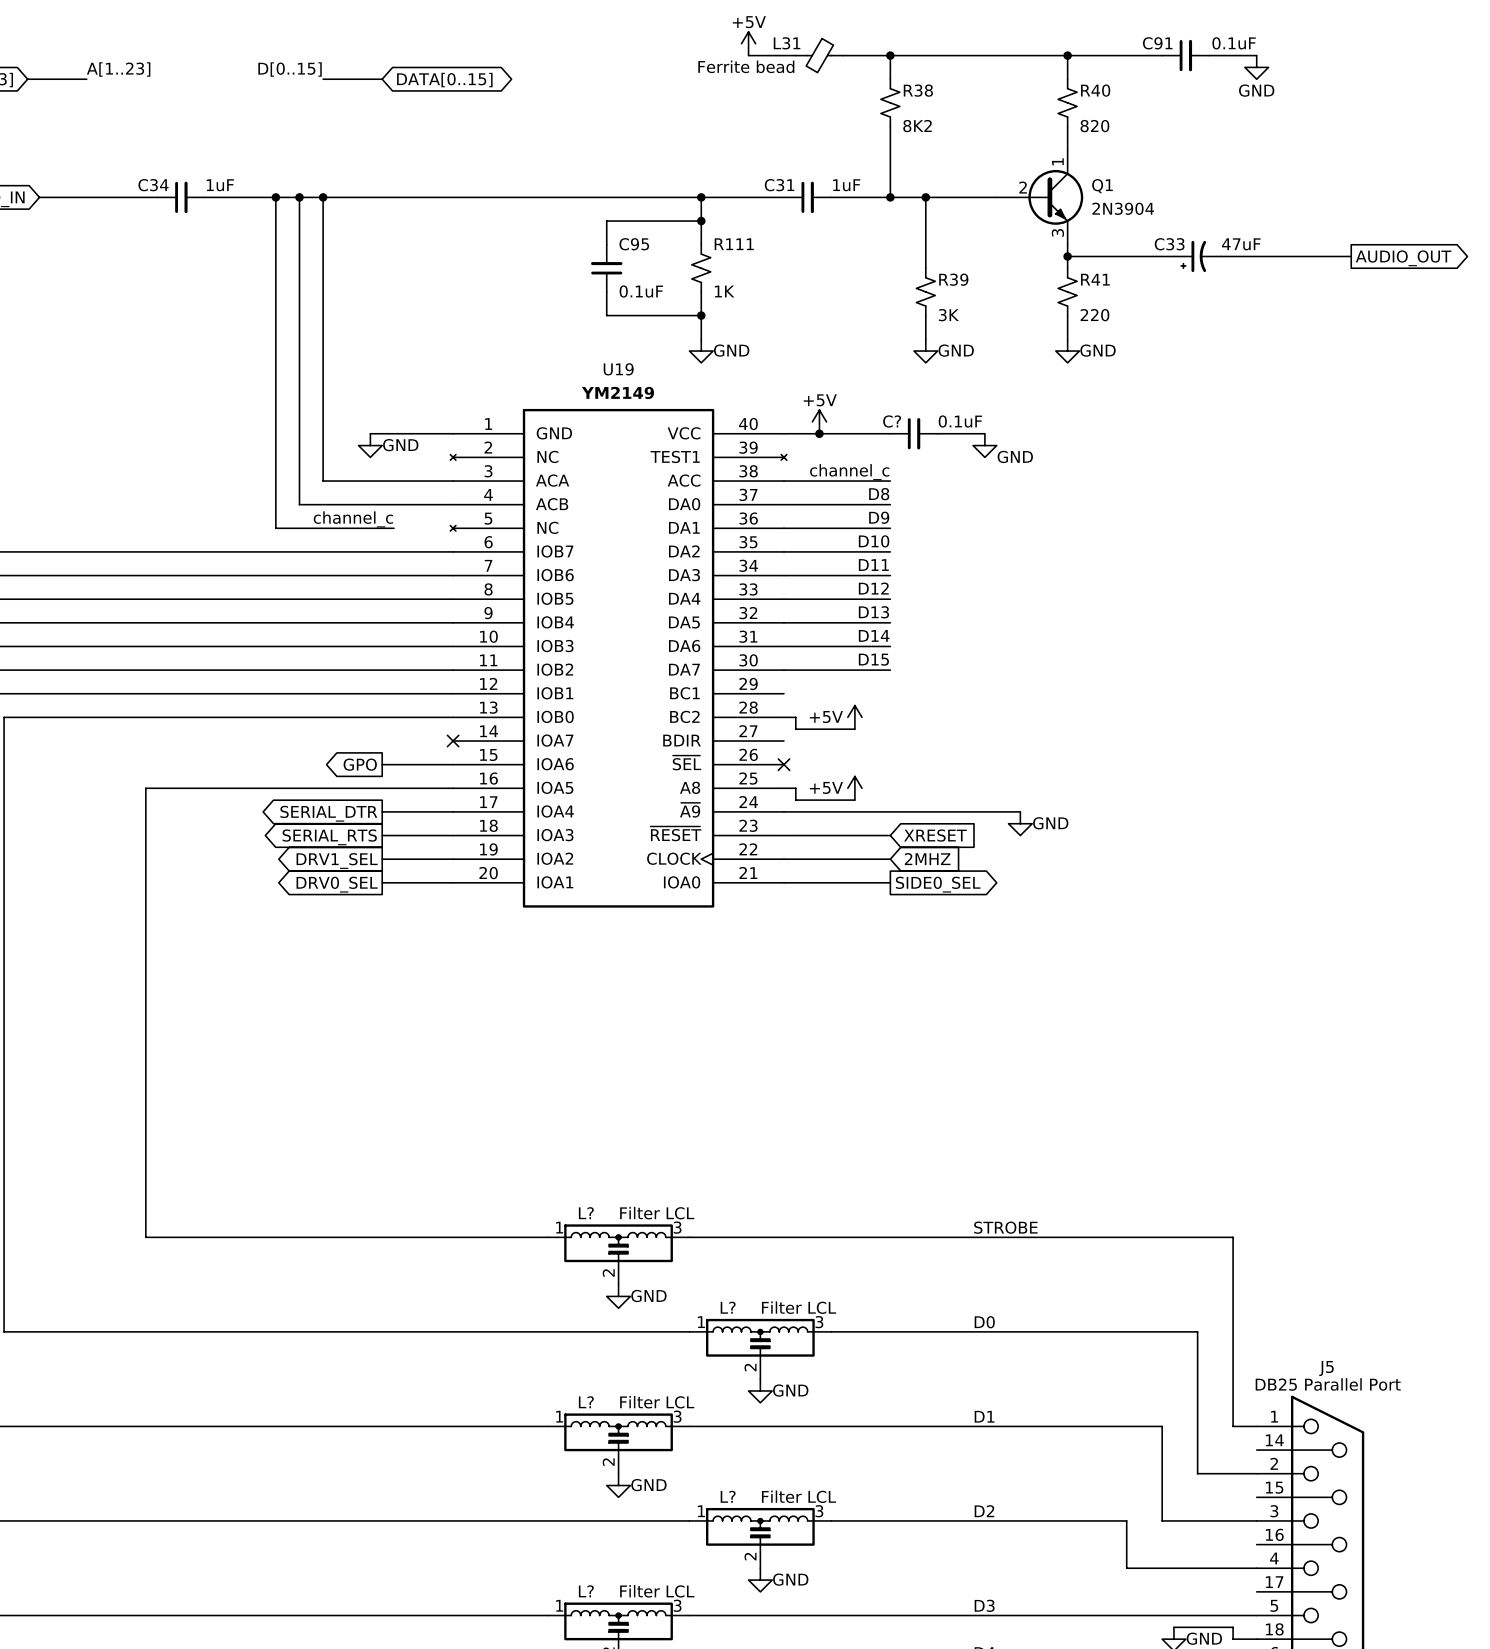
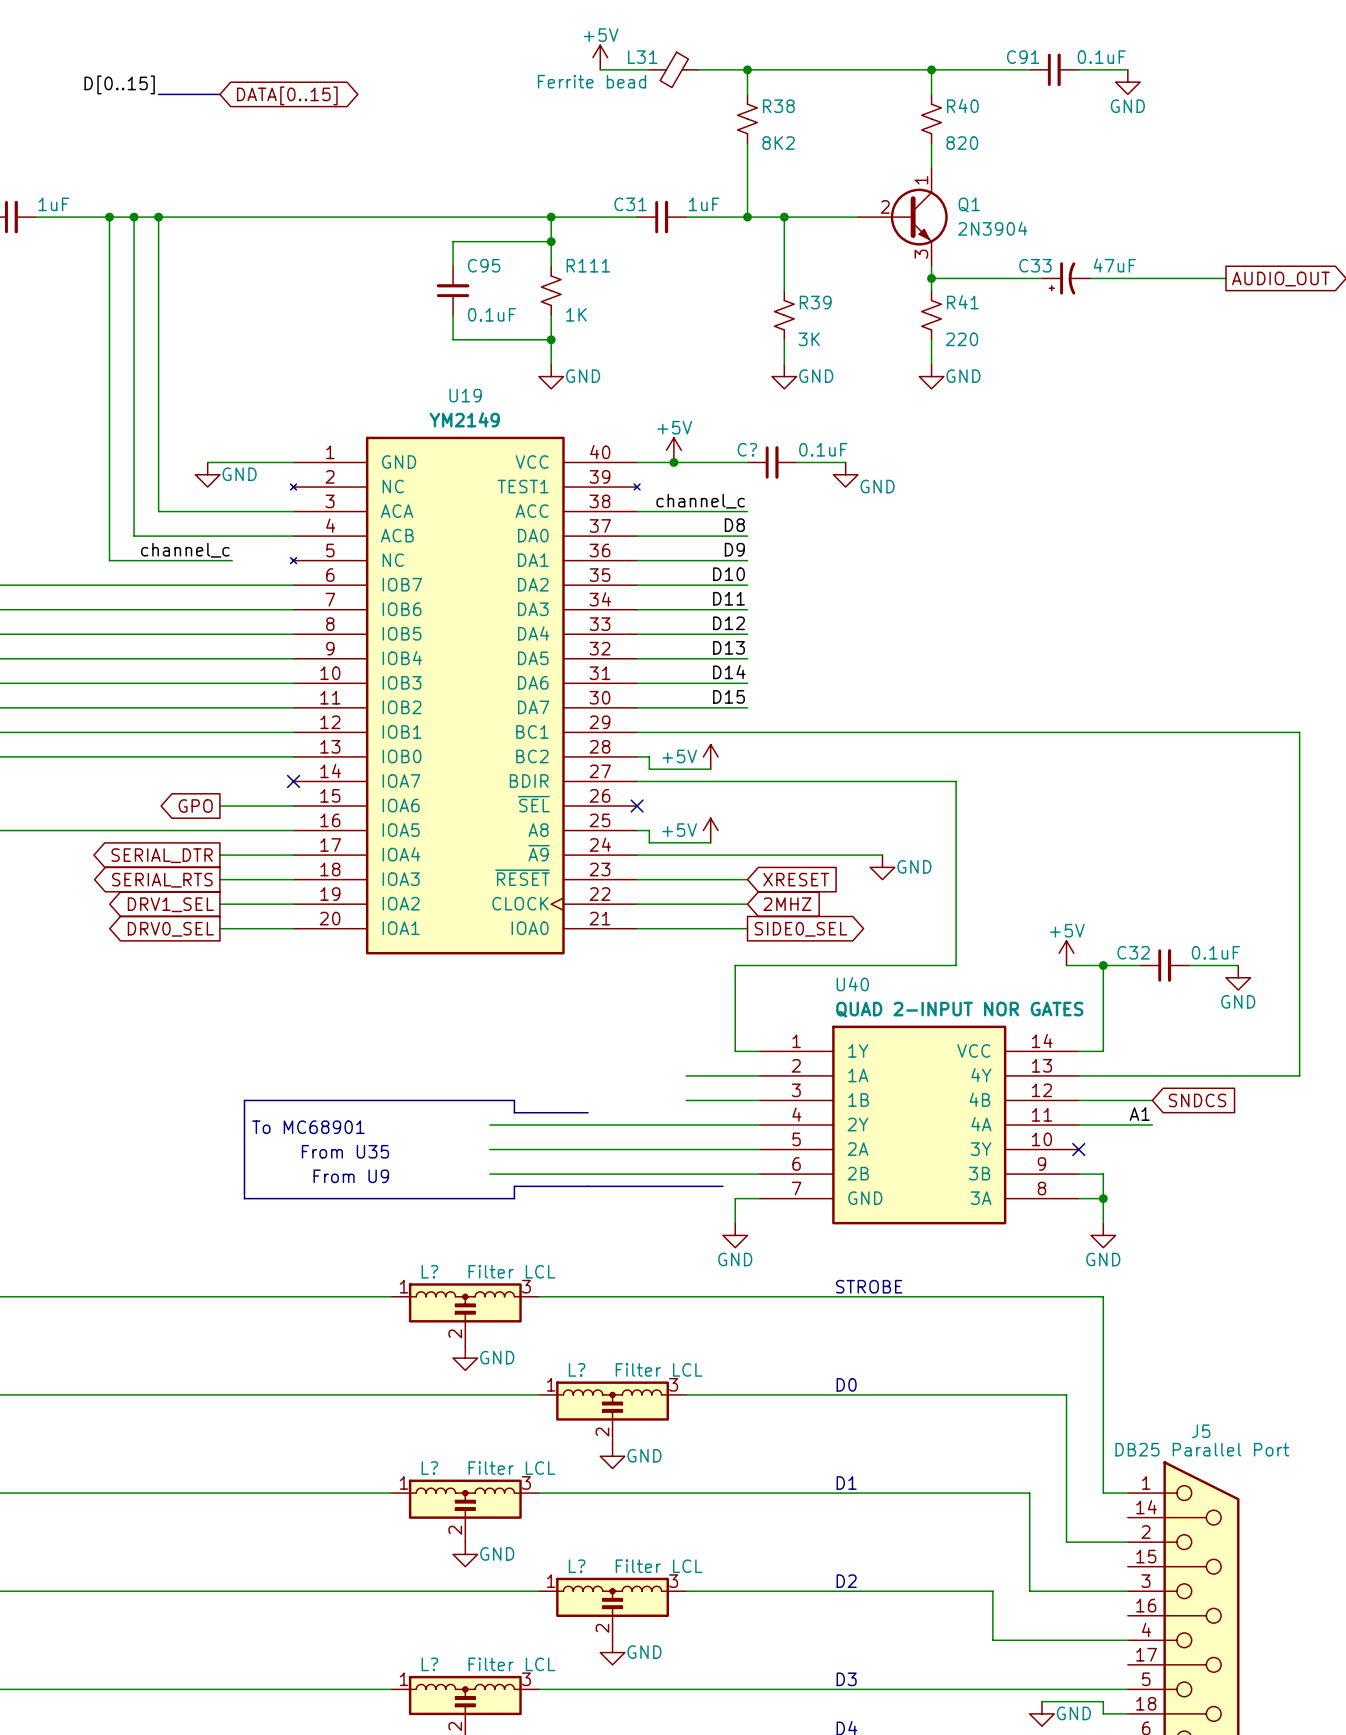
wire: none -> (637, 732) (1299, 732) (1299, 1075) (1078, 1075)
wire: none -> (637, 781) (956, 781) (956, 965) (735, 965) (735, 1051) (759, 1051)
power symbol: none -> +5V (1066, 953)
wire: none -> (1066, 965) (1140, 965)
wire: none -> (1103, 965) (1103, 1051) (1078, 1051)
junction: none -> (1103, 965)
C32: none -> 0.1uF (1164, 965)
wire: none -> (1189, 965) (1238, 965)
power symbol: none -> GND (1238, 977)
wire: none -> (686, 1075) (759, 1075)
wire: none -> (686, 1100) (759, 1100)
wire: none -> (1078, 1100) (1152, 1100)
global label: none -> SNDCS (1197, 1100)
line: none -> (588, 1112) (514, 1112) (514, 1100) (244, 1100) (244, 1198) (514, 1198) (514, 1186) (722, 1186)
label: none -> A1 (1139, 1114)
wire: none -> (489, 1125) (759, 1125)
U40: none -> QUAD 2-INPUT NOR GATES (919, 1125)
wire: none -> (1078, 1125) (1152, 1125)
text: none -> To MC68901 (308, 1127)
wire: none -> (489, 1149) (759, 1149)
no-connect mark: none -> (1078, 1149)
text: none -> From U35 (345, 1151)
wire: none -> (489, 1174) (759, 1174)
wire: none -> (1078, 1174) (1103, 1174) (1103, 1223)
text: none -> From U9 (351, 1176)
wire: none -> (759, 1198) (735, 1198) (735, 1223)
wire: none -> (1078, 1198) (1103, 1198)
junction: none -> (1103, 1198)
power symbol: none -> GND (735, 1235)
power symbol: none -> GND (1103, 1235)

